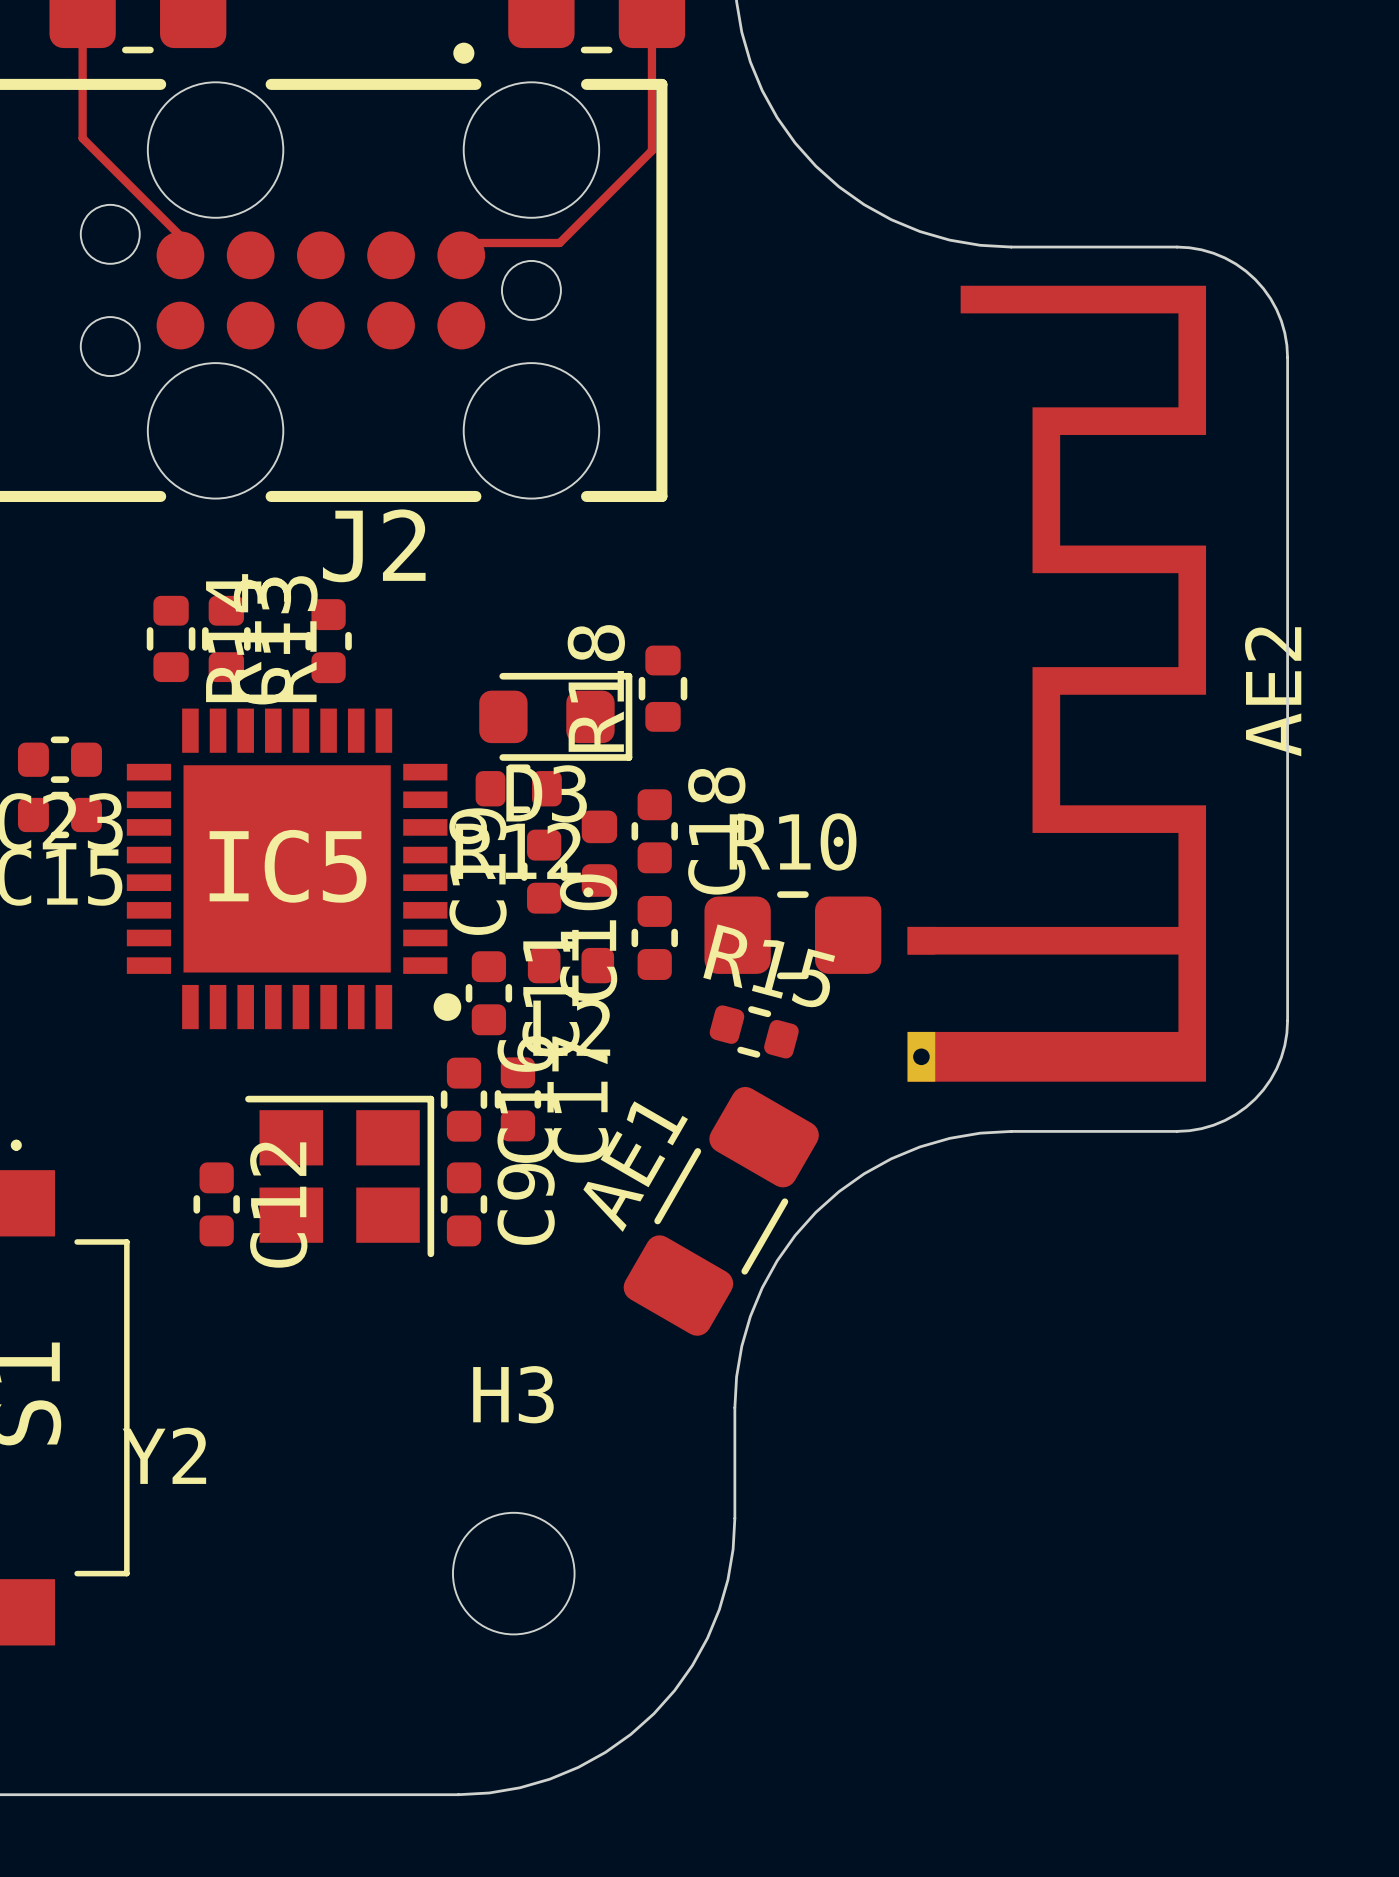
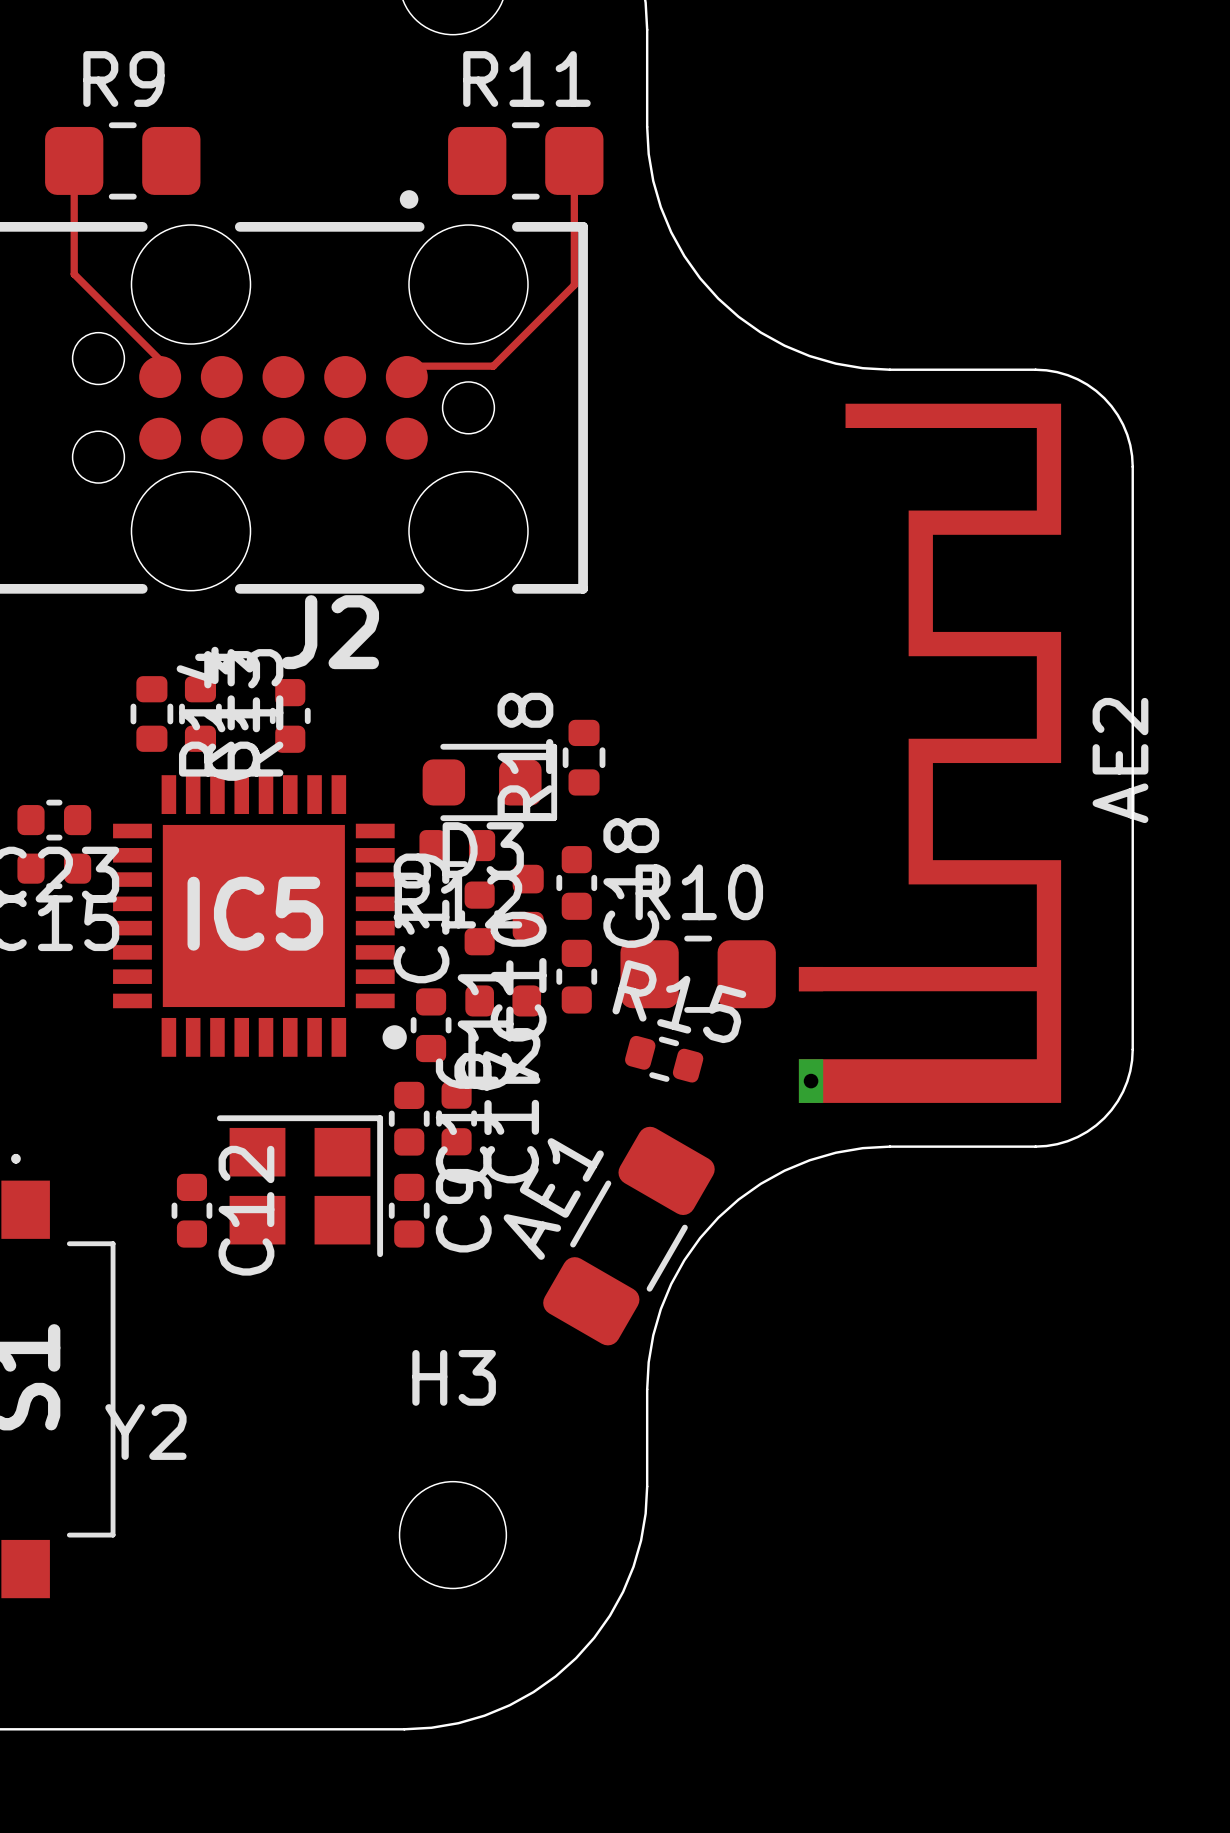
AE1 position: (721, 1211) -> (628, 1236)

